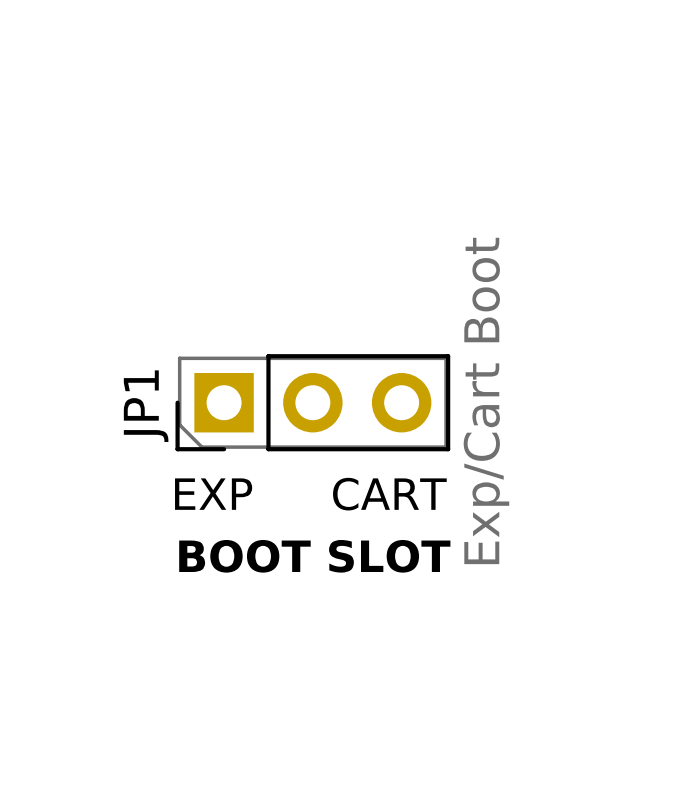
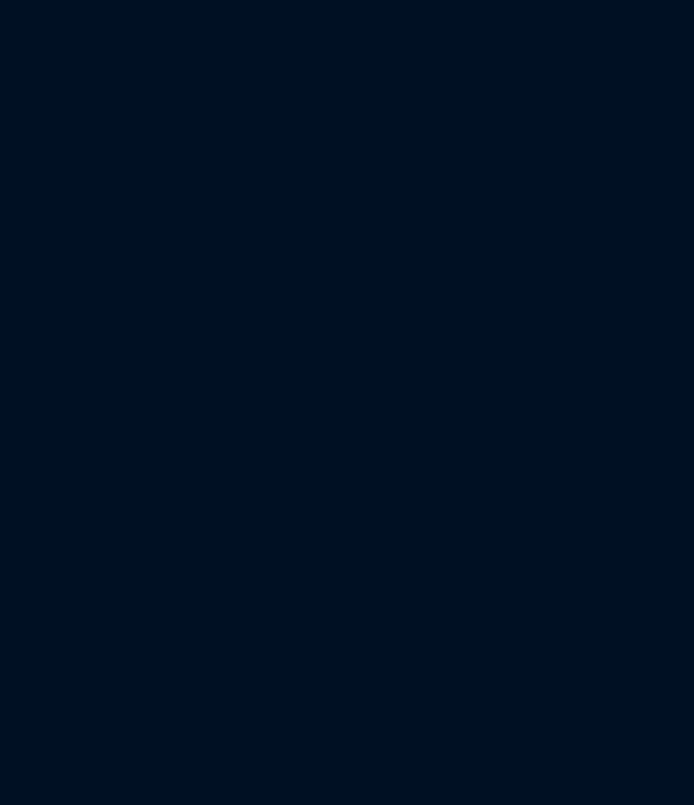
JP1: Exp/Cart Boot (312, 402) -> none
text: EXP (213, 494) -> none
text: CART (389, 494) -> none
text: BOOT SLOT (314, 556) -> none

